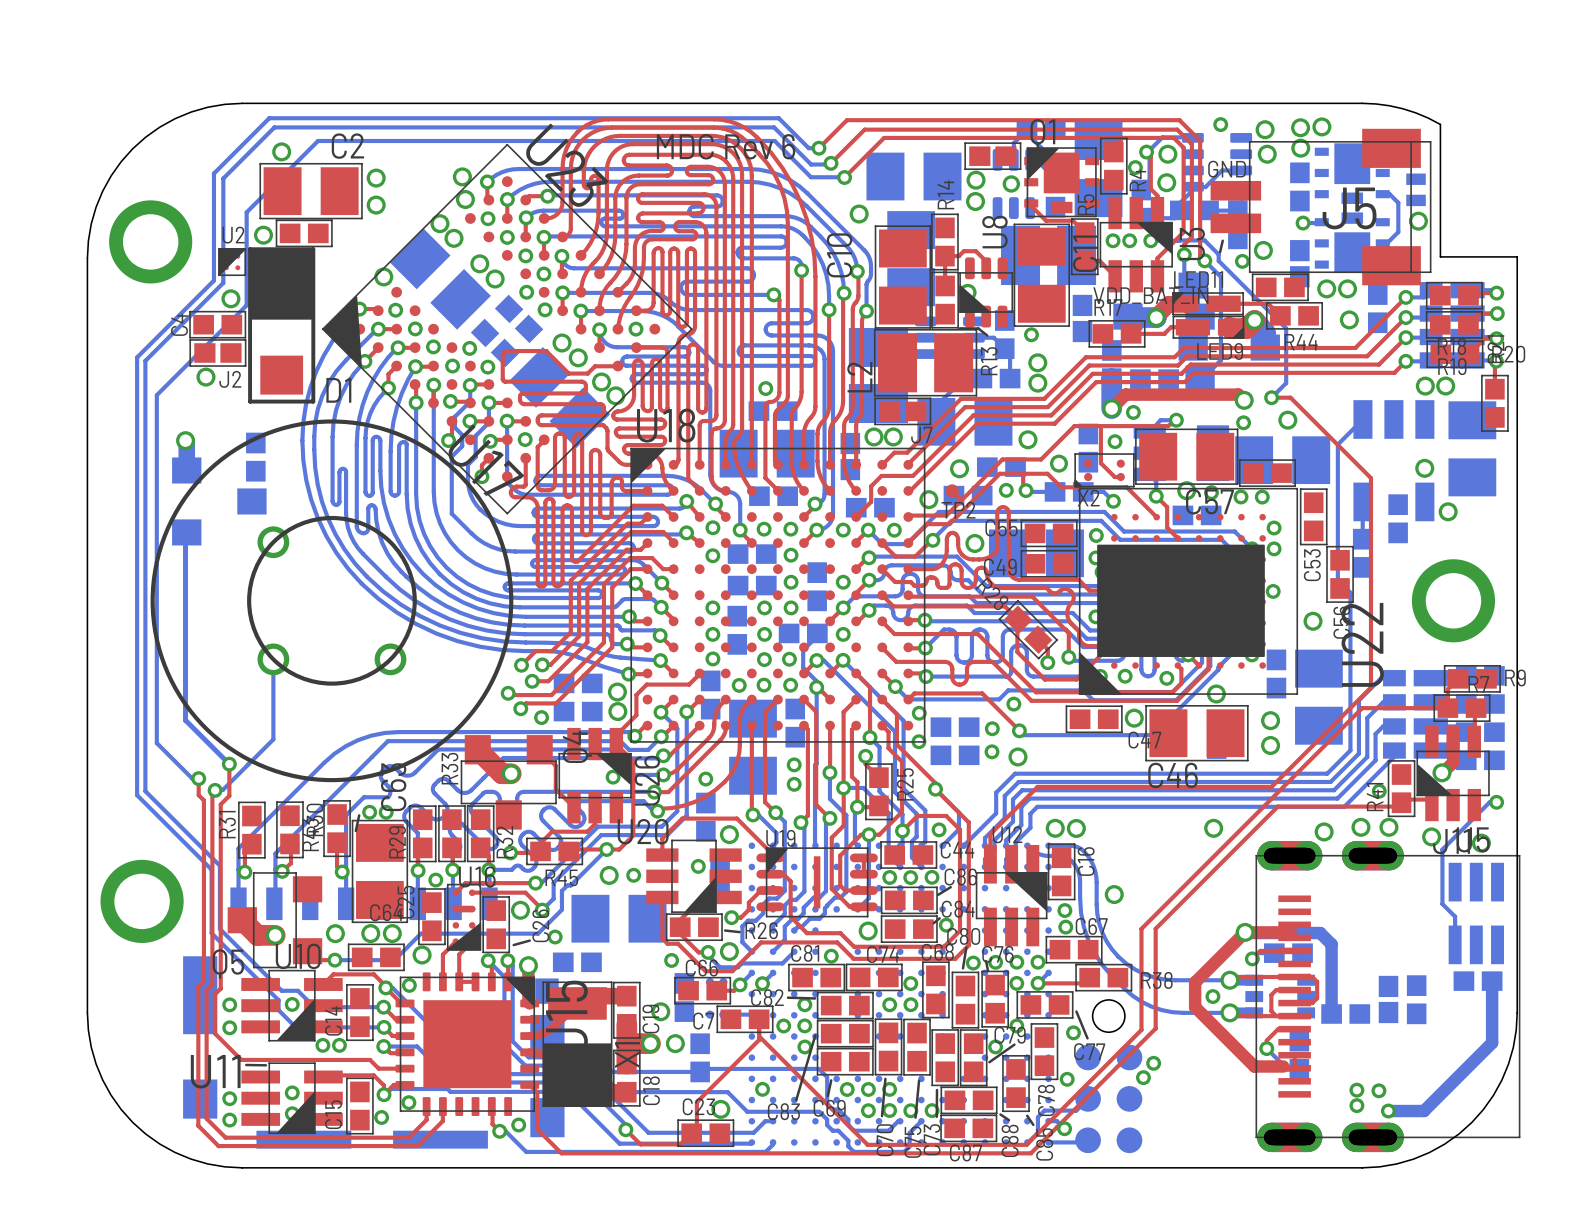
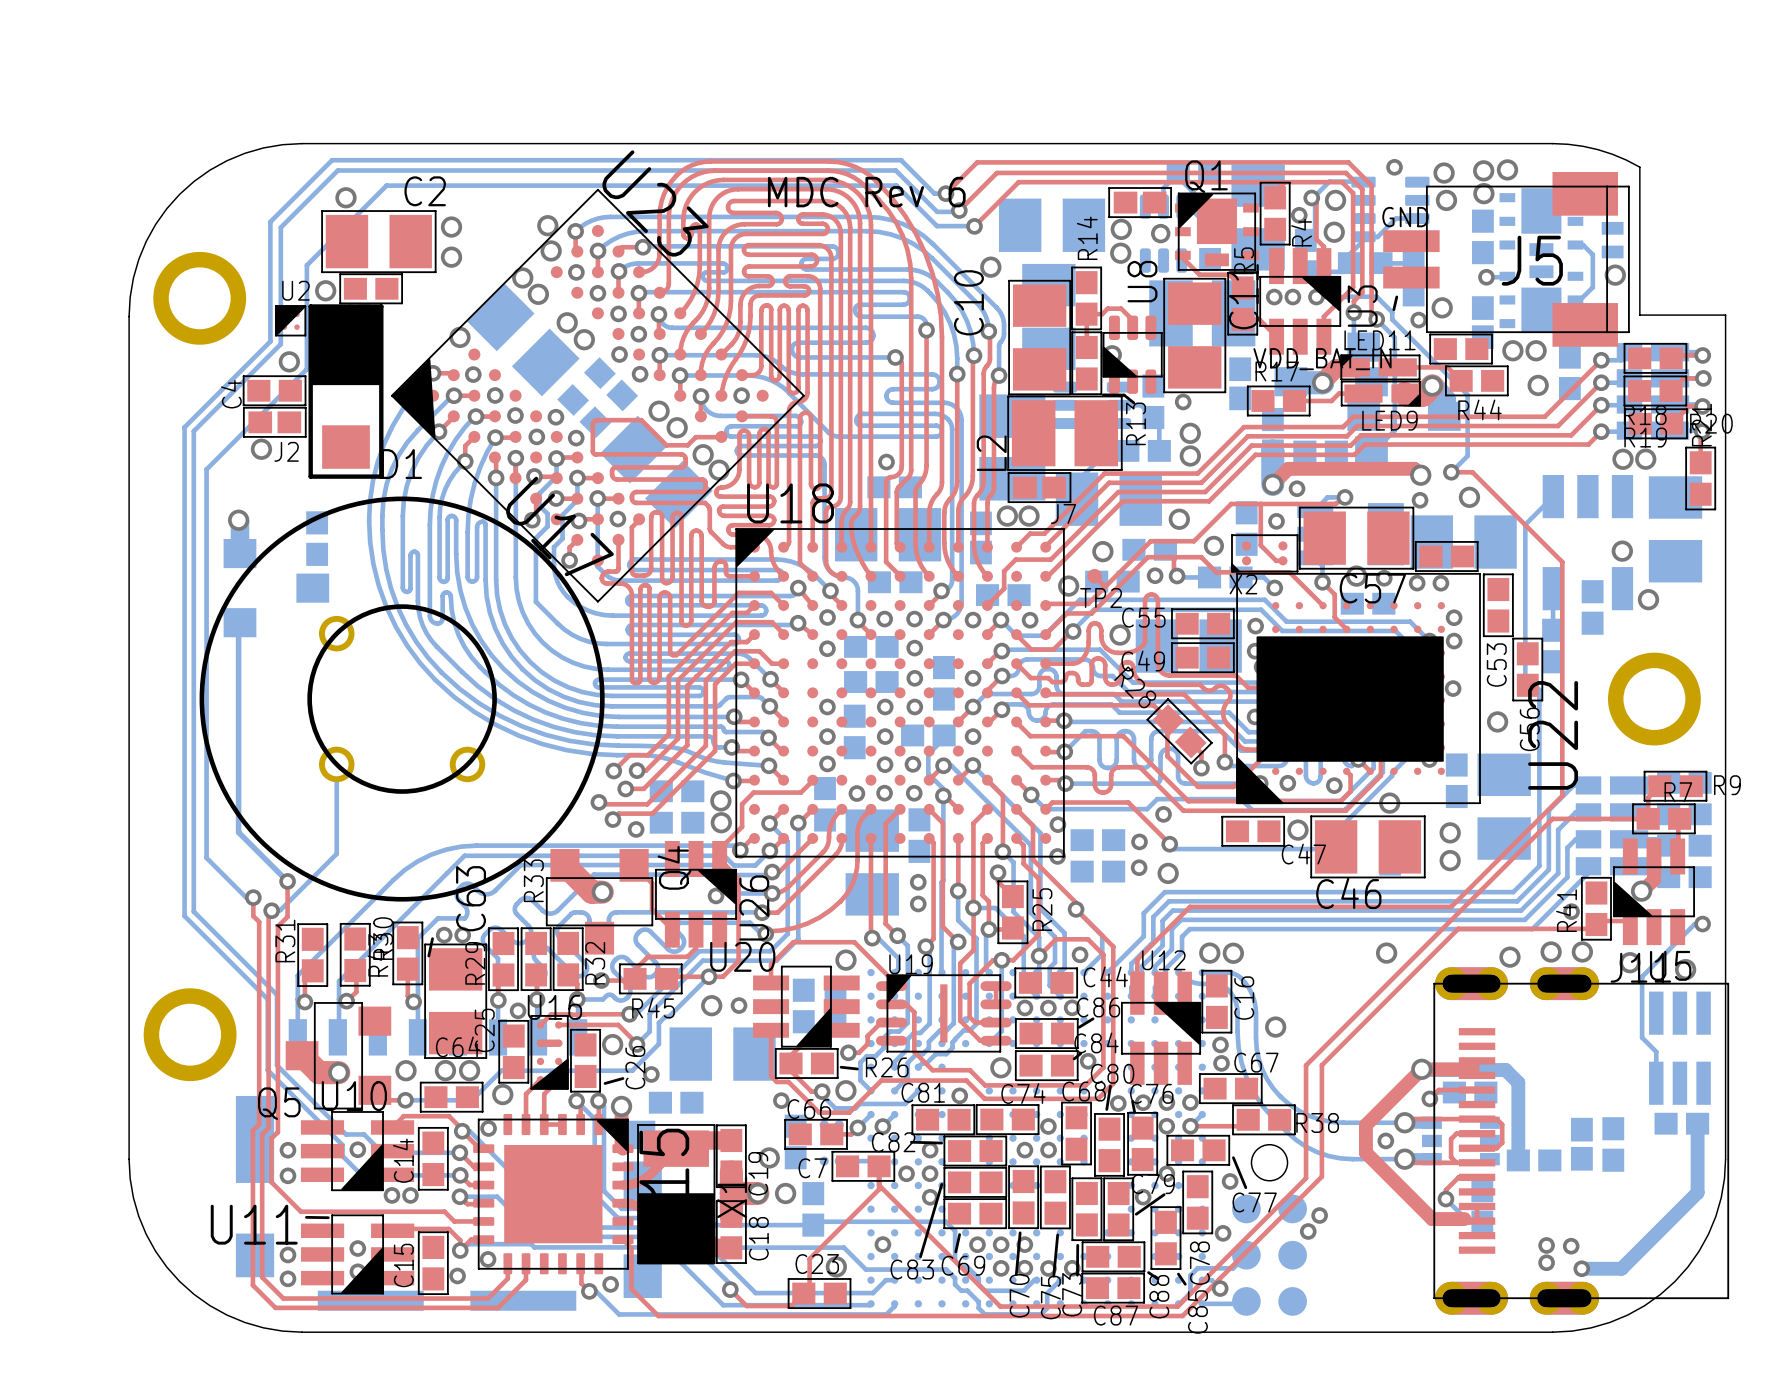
via: (705, 779) -> none
part position: (705, 817) -> (803, 1005)
via: (698, 866) -> none

